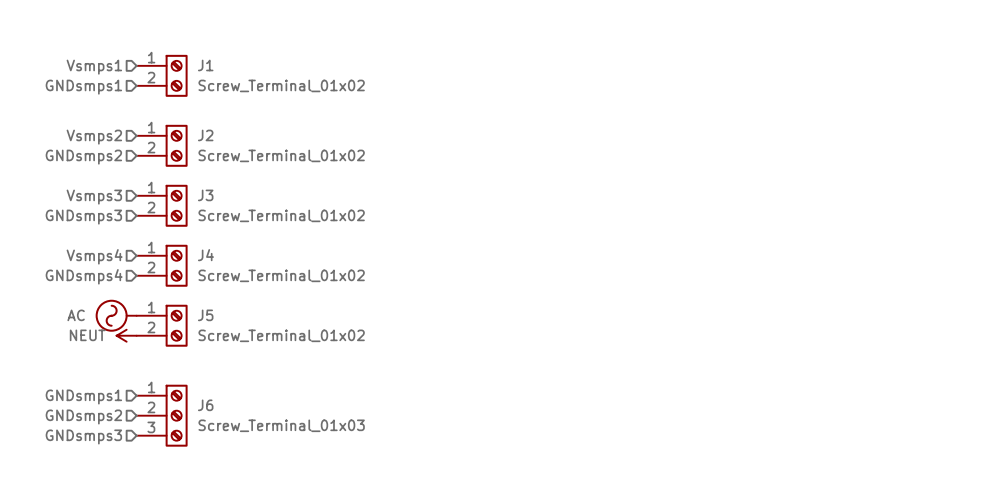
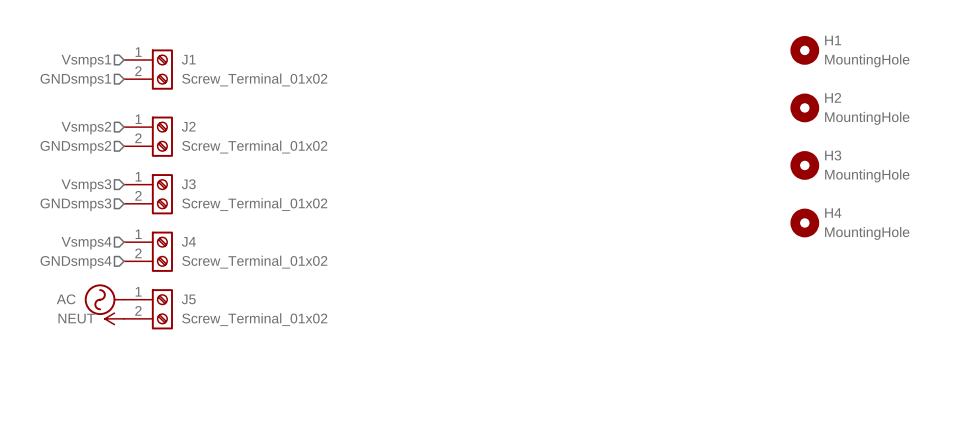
H1: none -> MountingHole (804, 50)
H2: none -> MountingHole (804, 107)
H3: none -> MountingHole (804, 165)
H4: none -> MountingHole (804, 222)
hierarchical label: GNDsmps1 (83, 396) -> none
J6: Screw_Terminal_01x03 (162, 415) -> none
hierarchical label: GNDsmps2 (83, 416) -> none
hierarchical label: GNDsmps3 (83, 436) -> none

